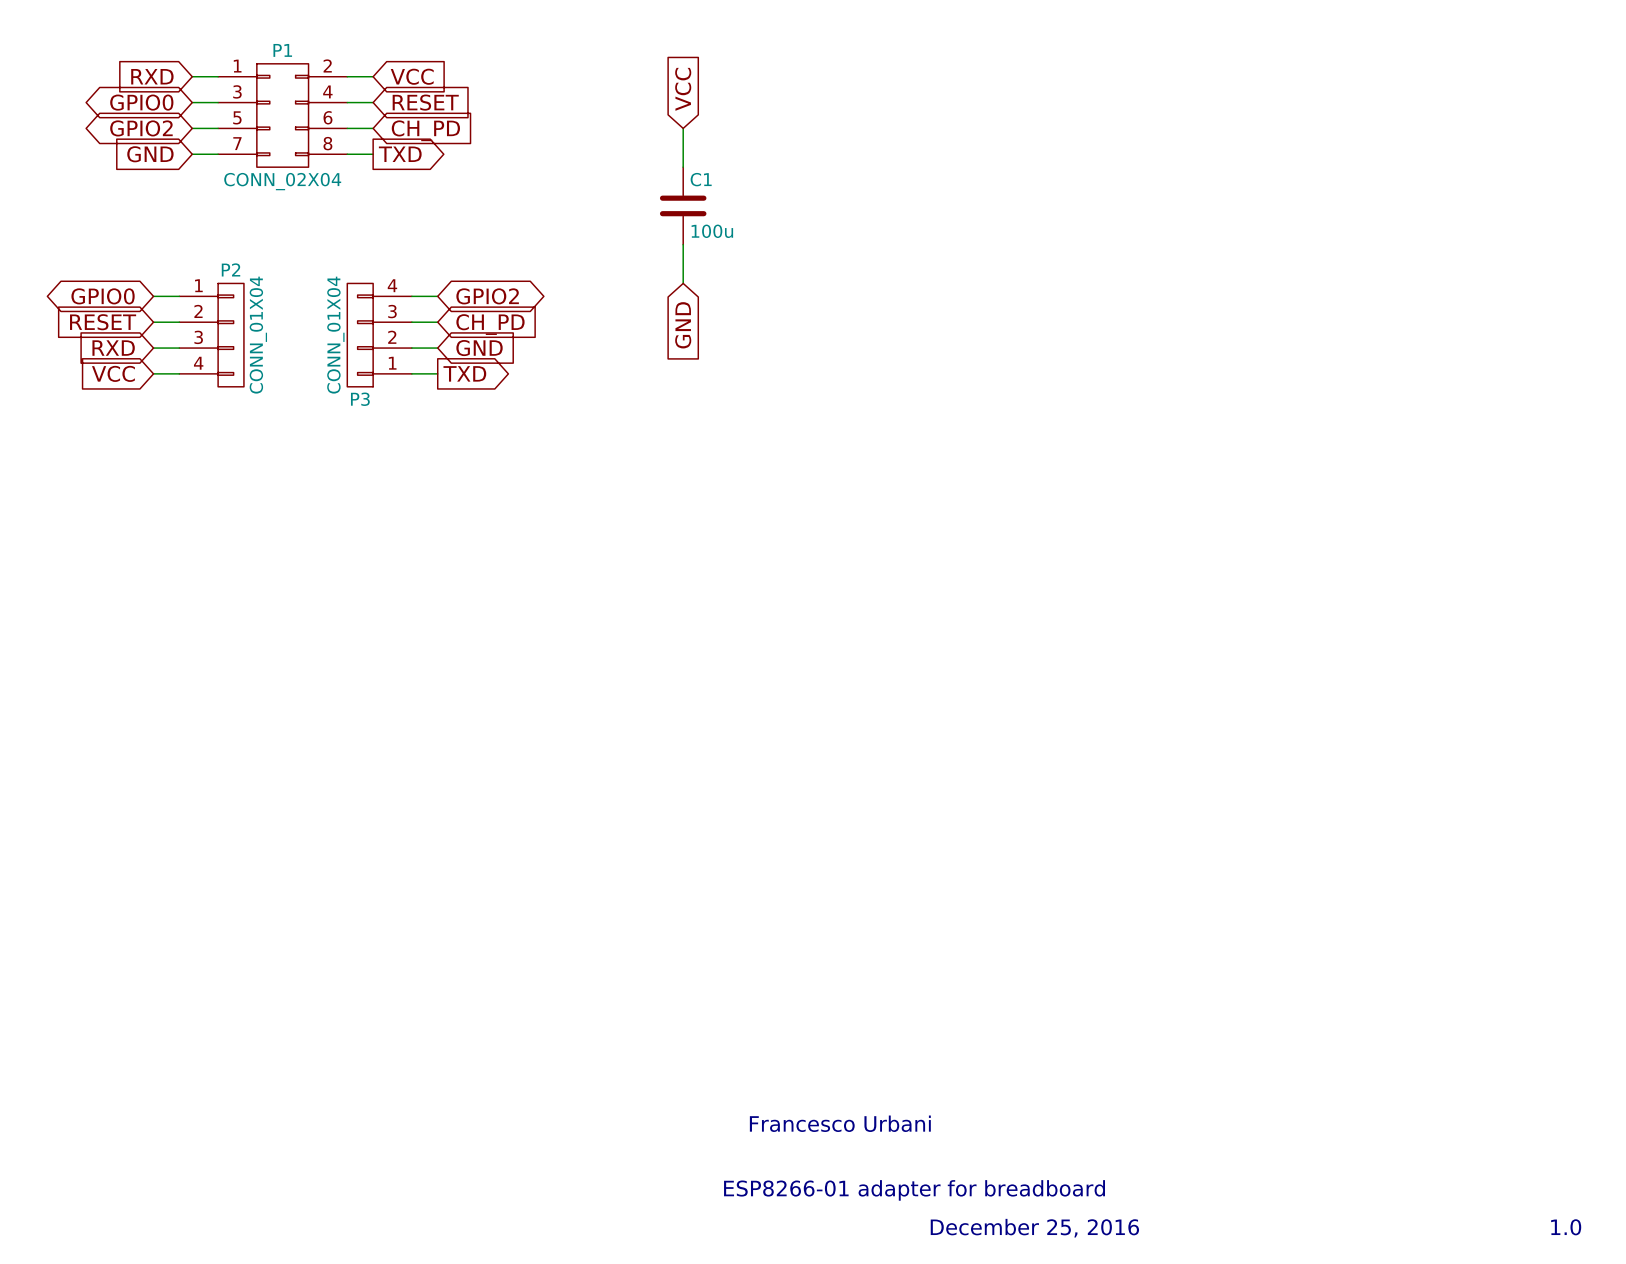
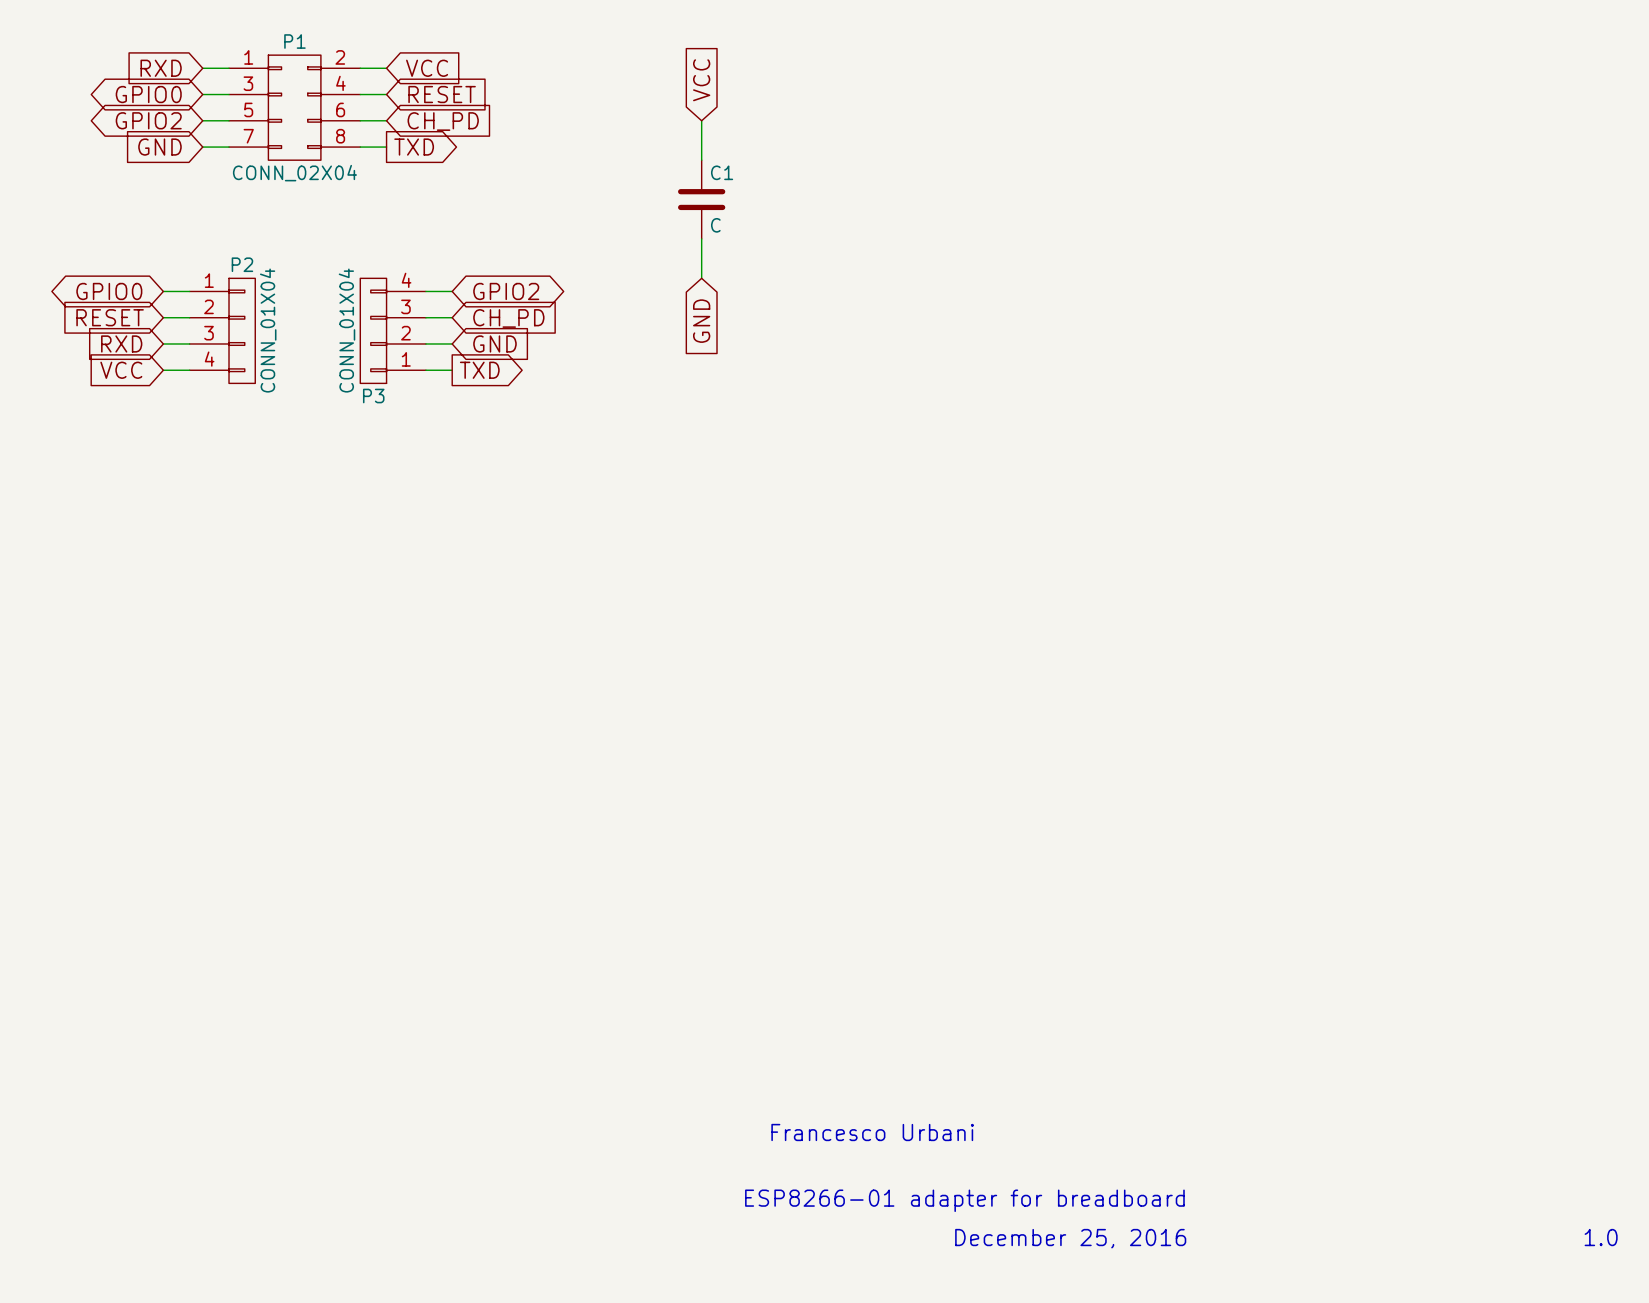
C1 value: 100u (712, 231) -> C (715, 225)

